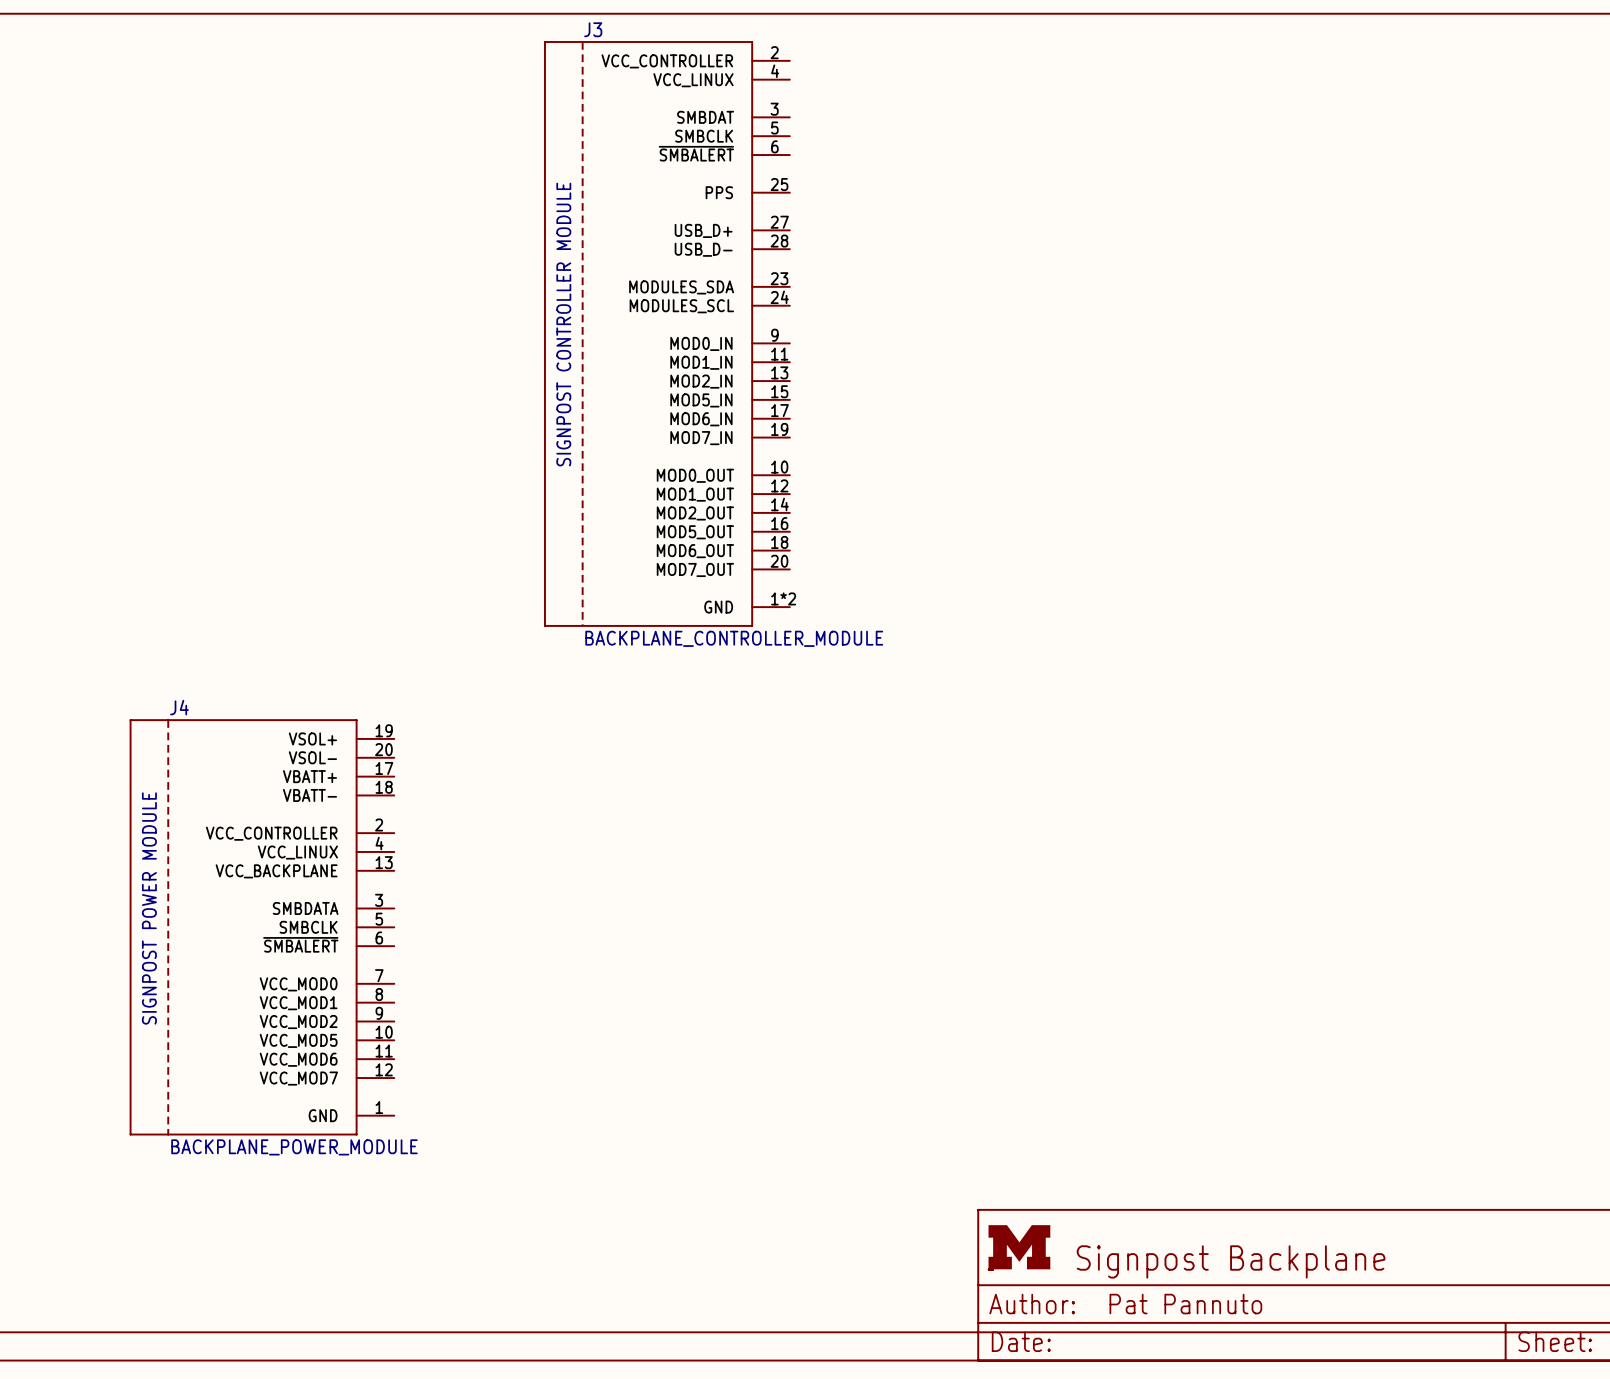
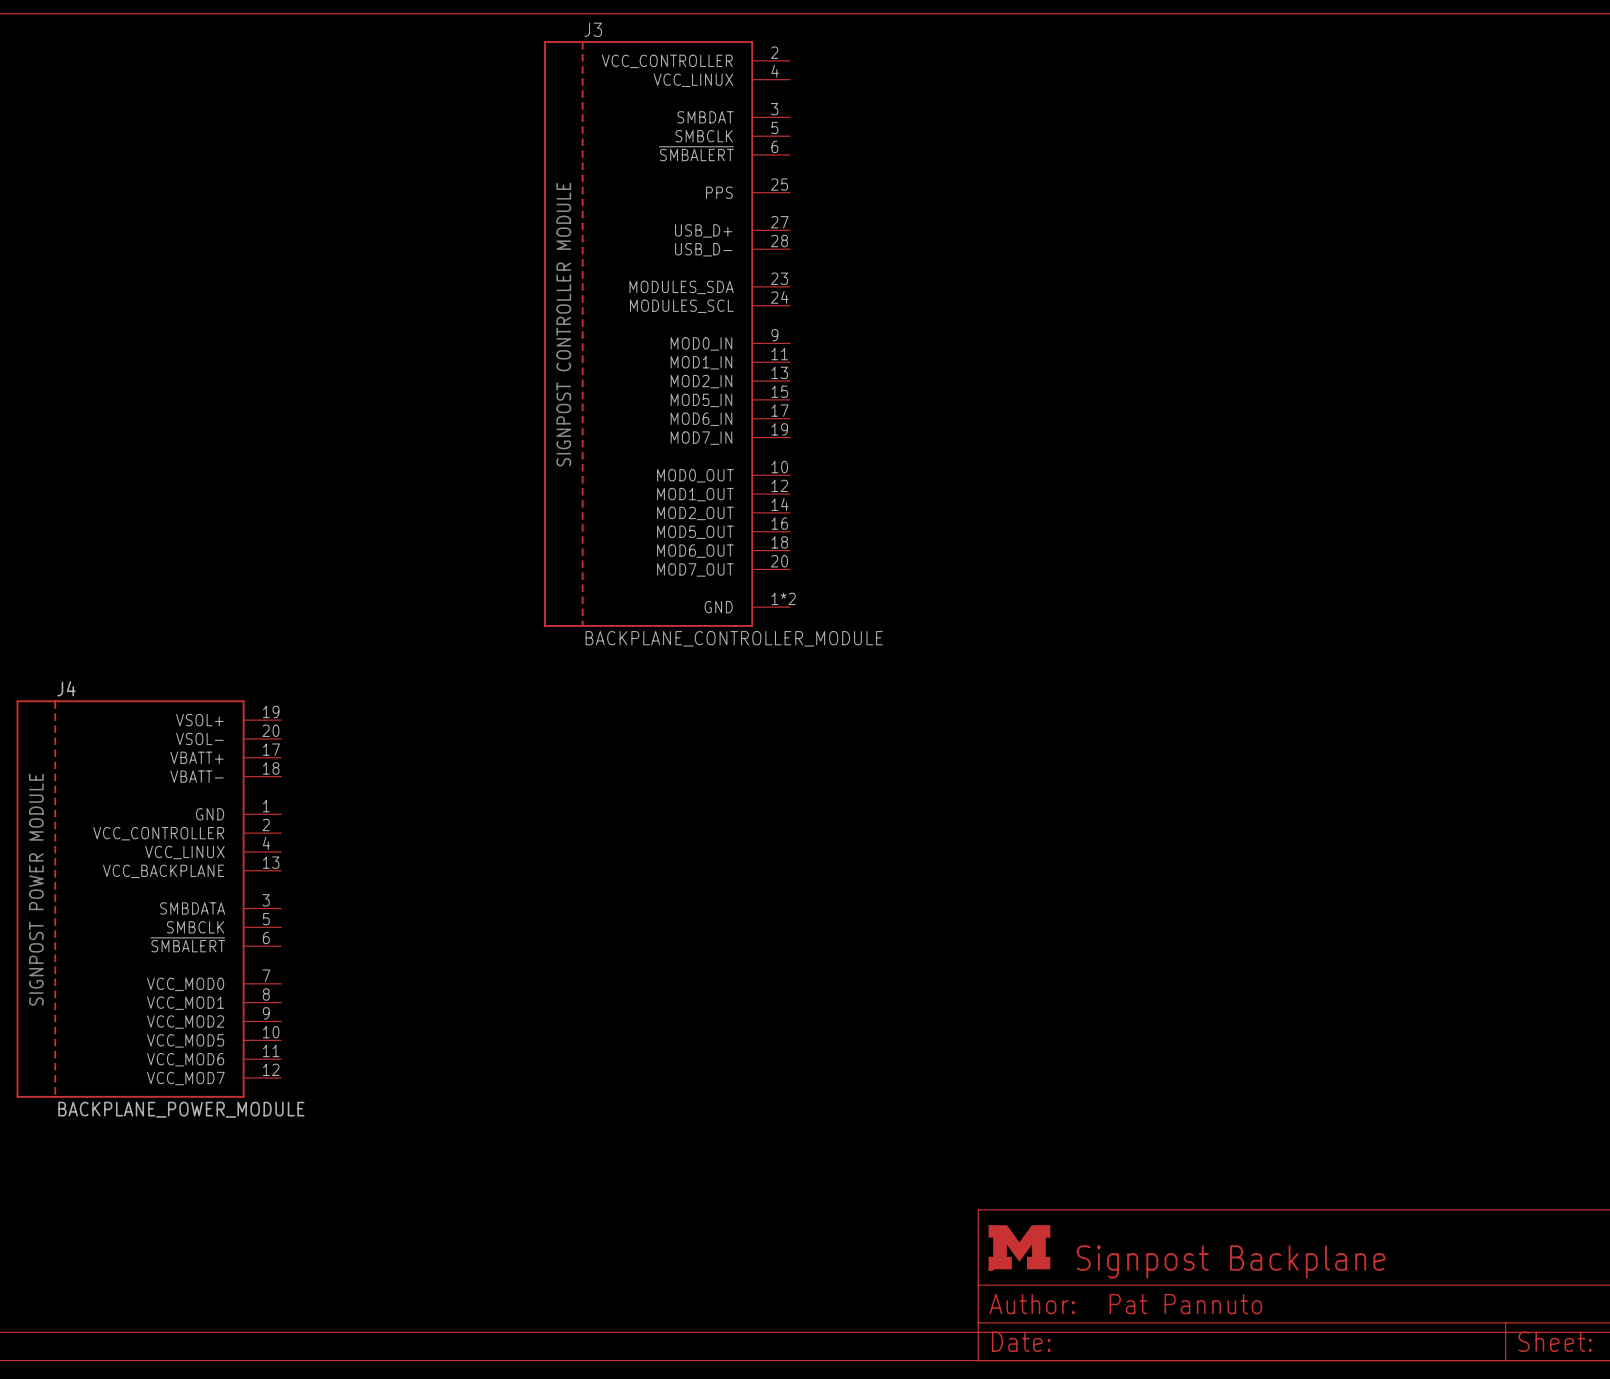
J4 symbol: [129, 719, 395, 1136] -> [16, 700, 282, 1098]

